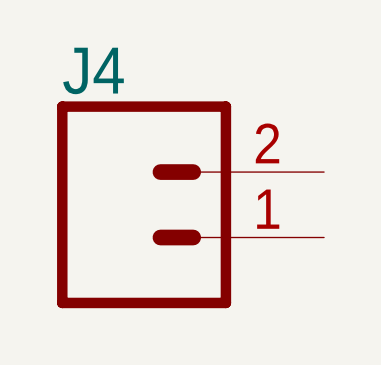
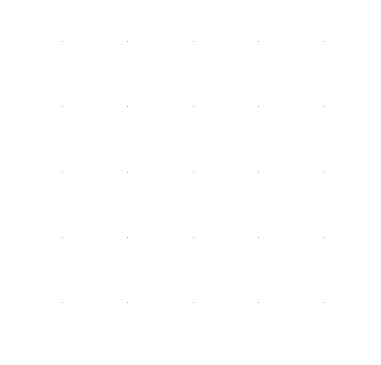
J4: (190, 204) -> none

